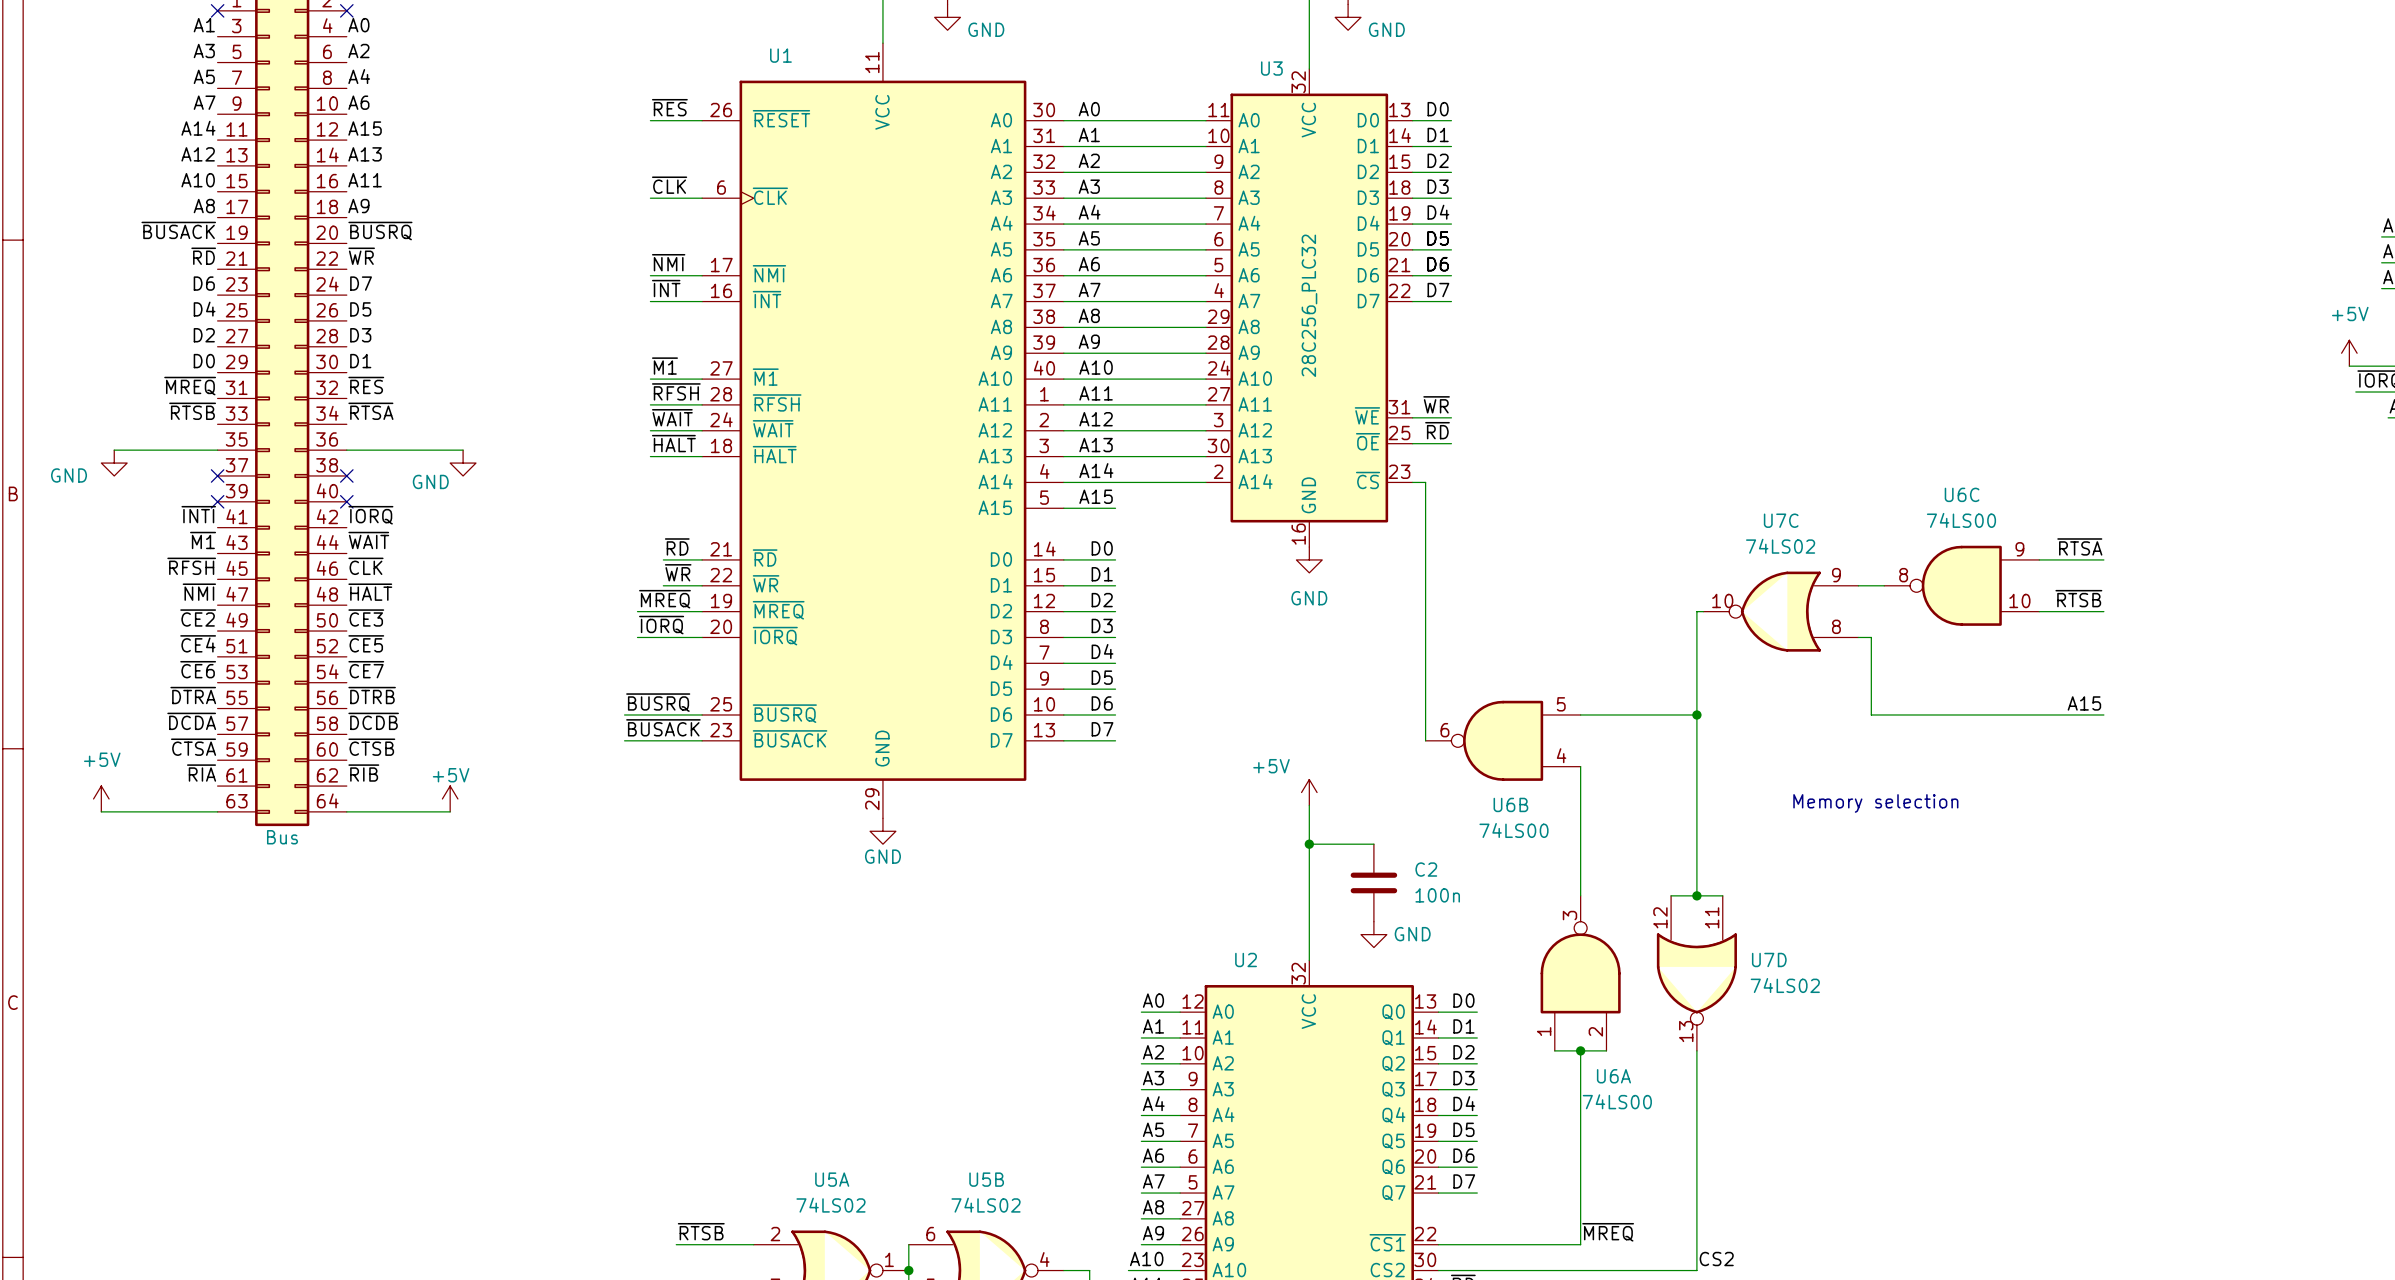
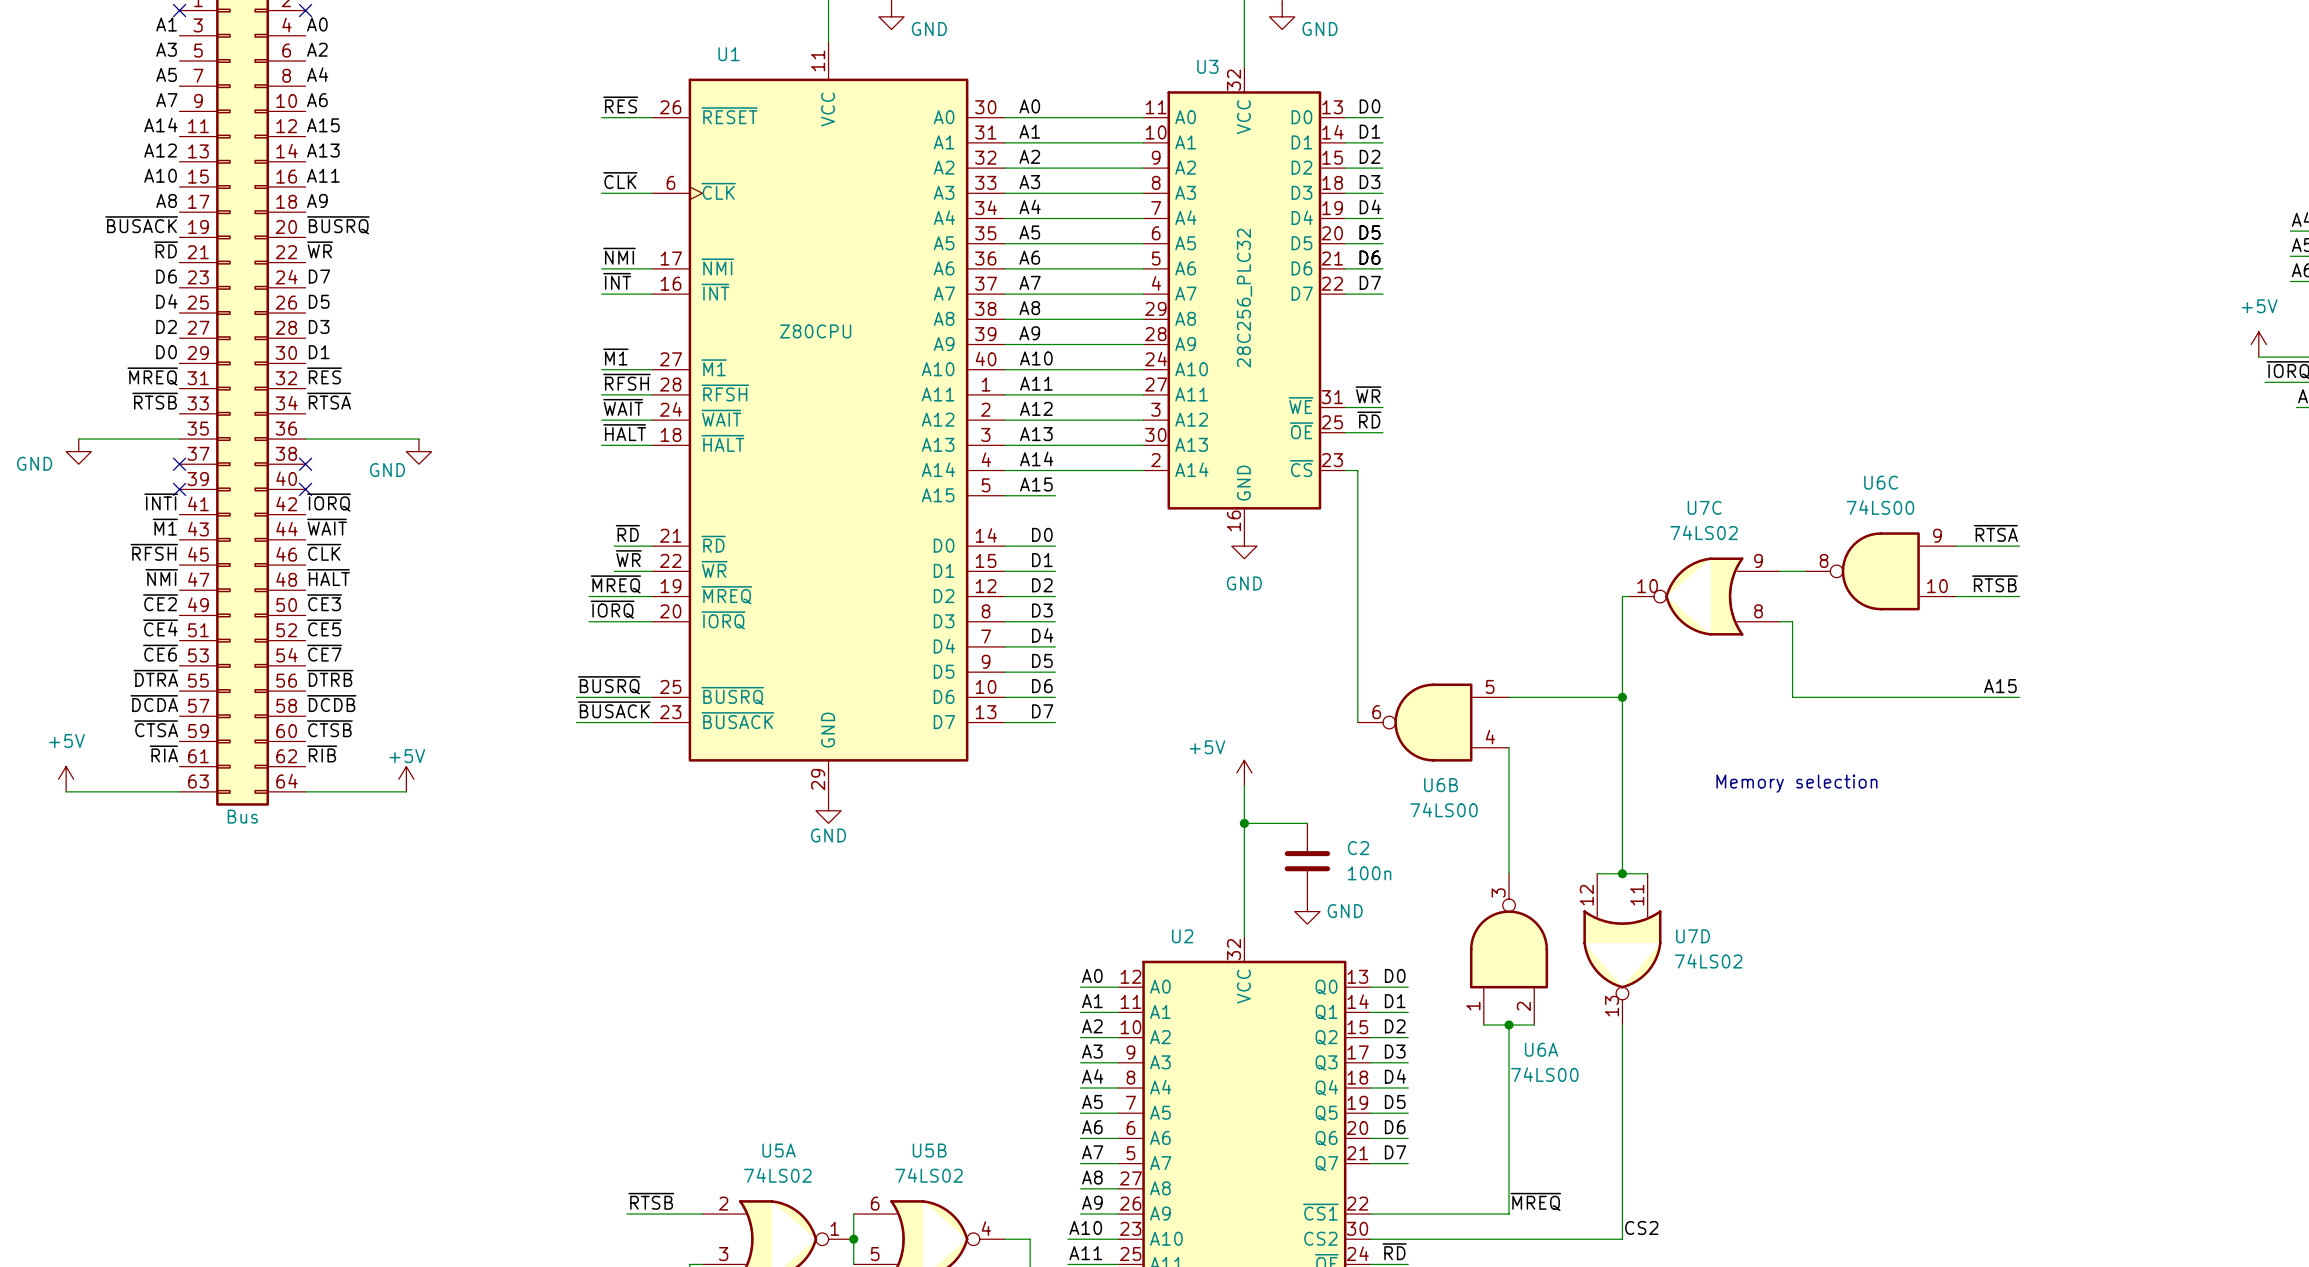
U1 value: none -> Z80CPU (815, 331)

